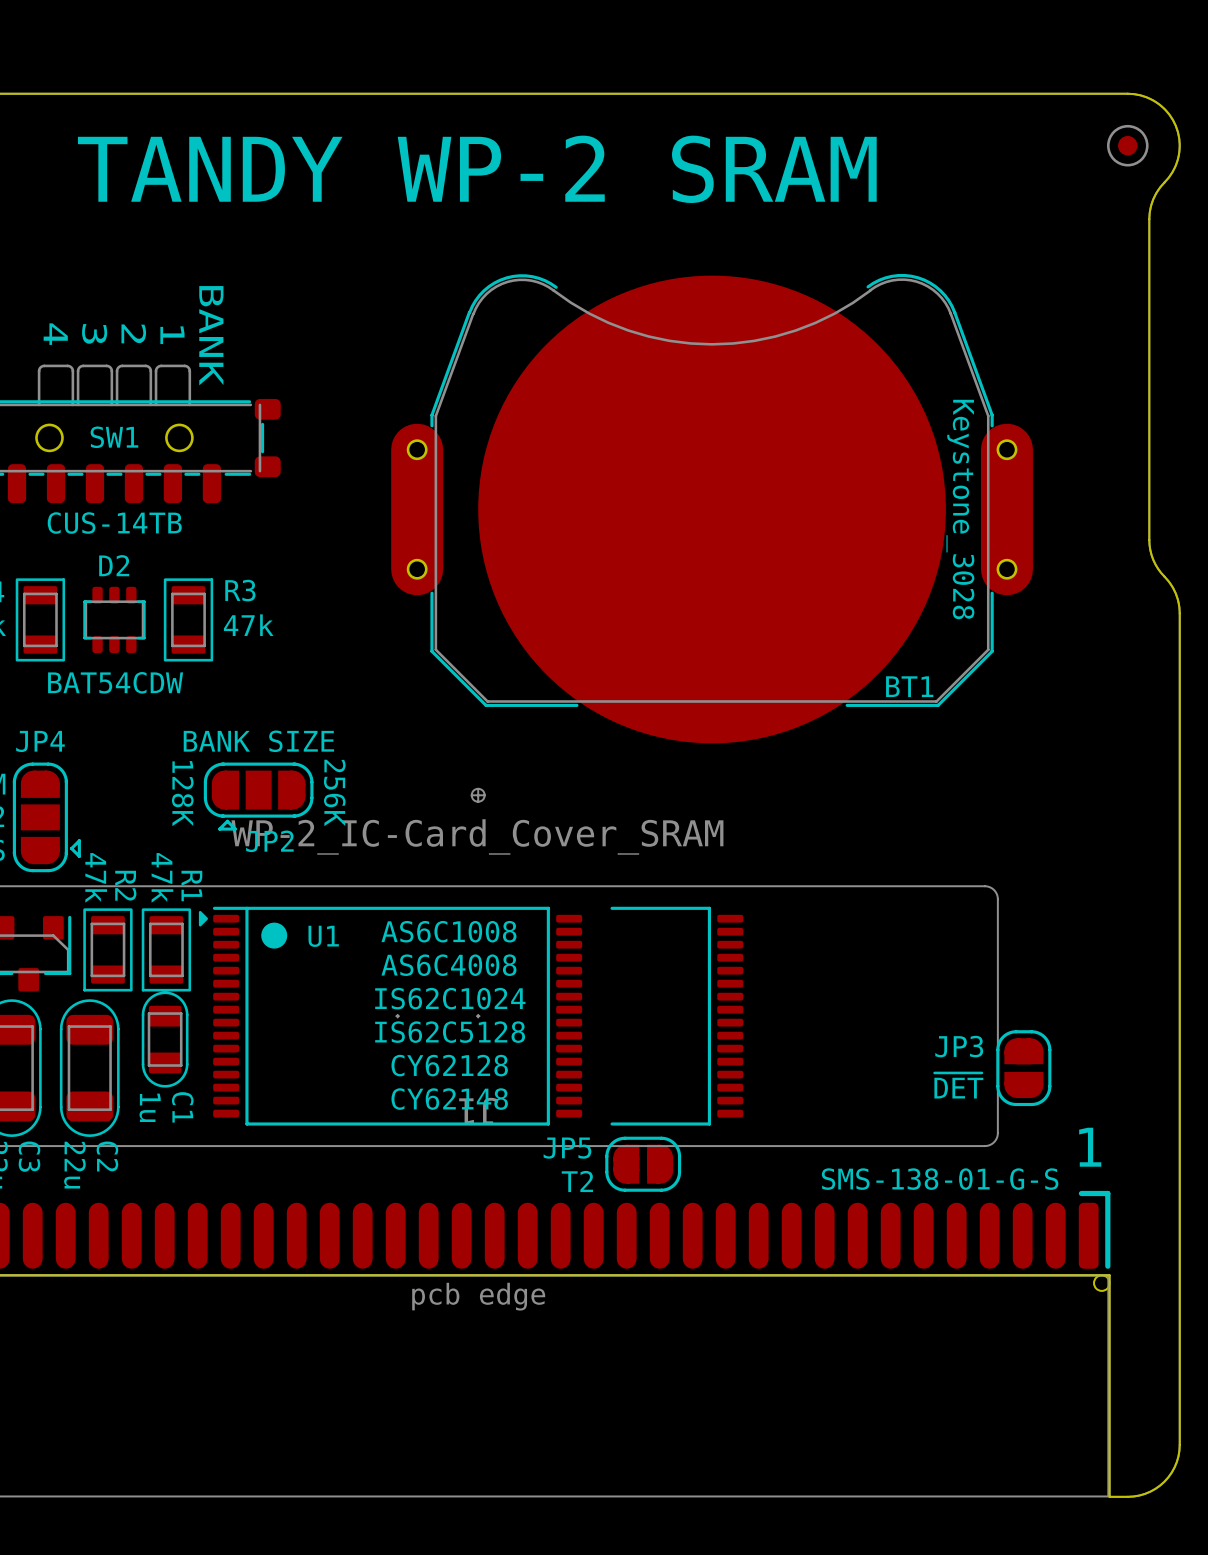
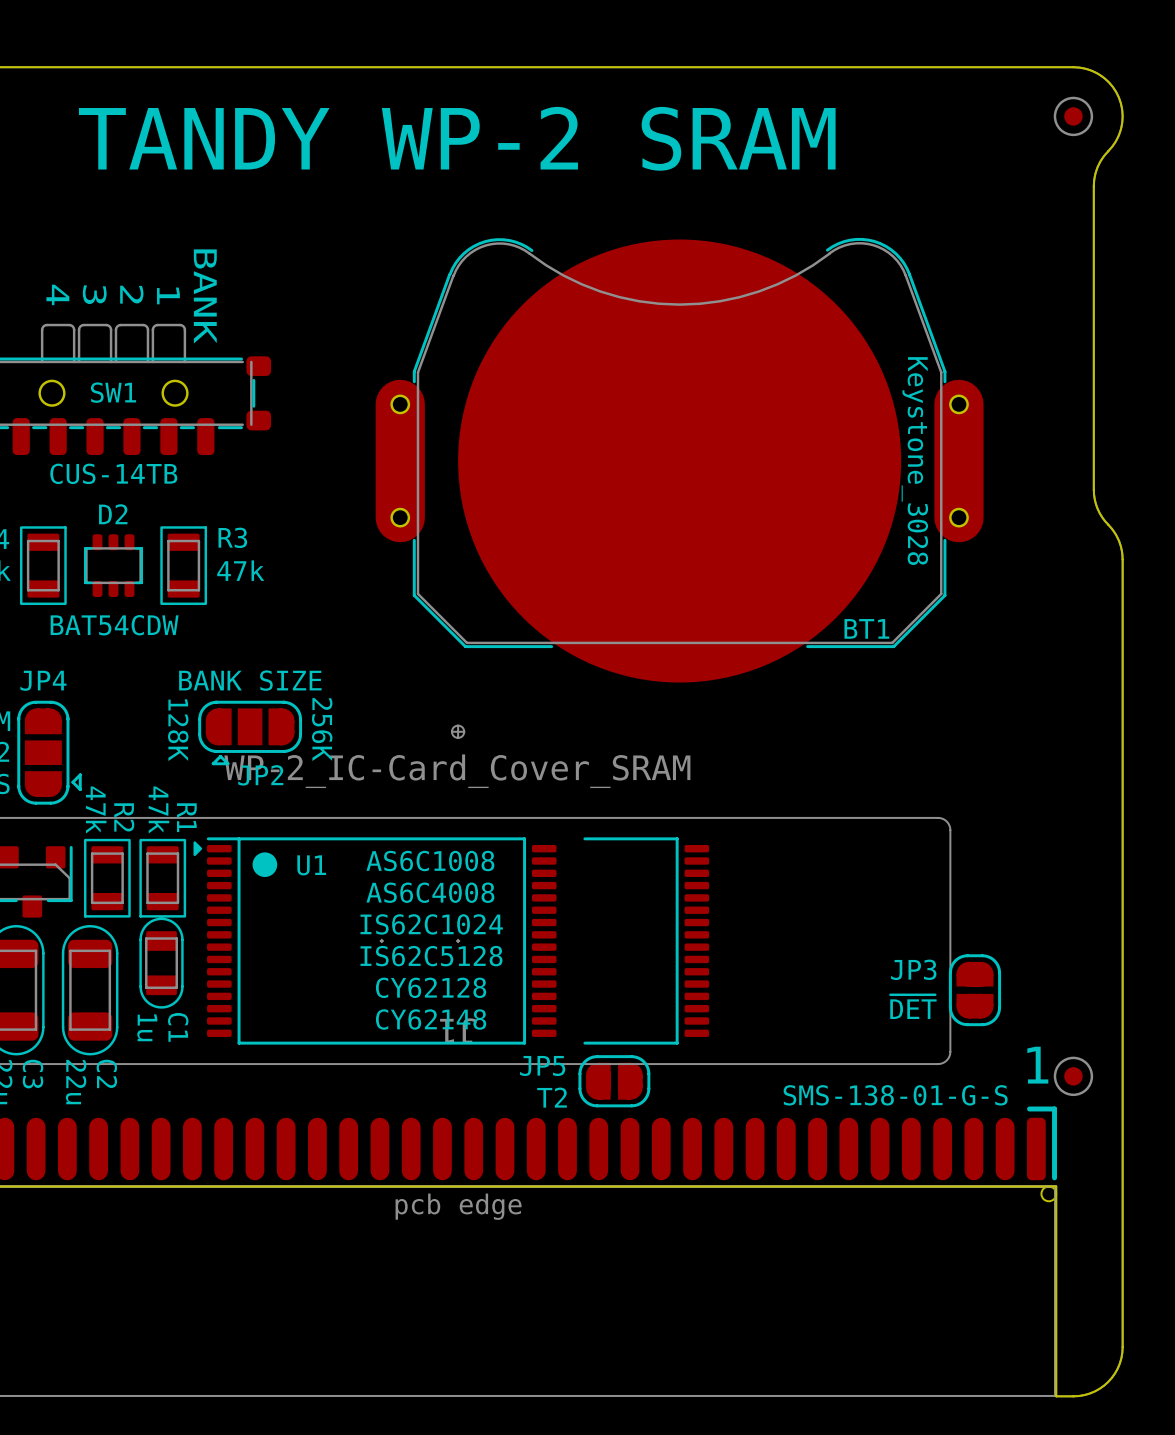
part: none -> (1073, 1076)

